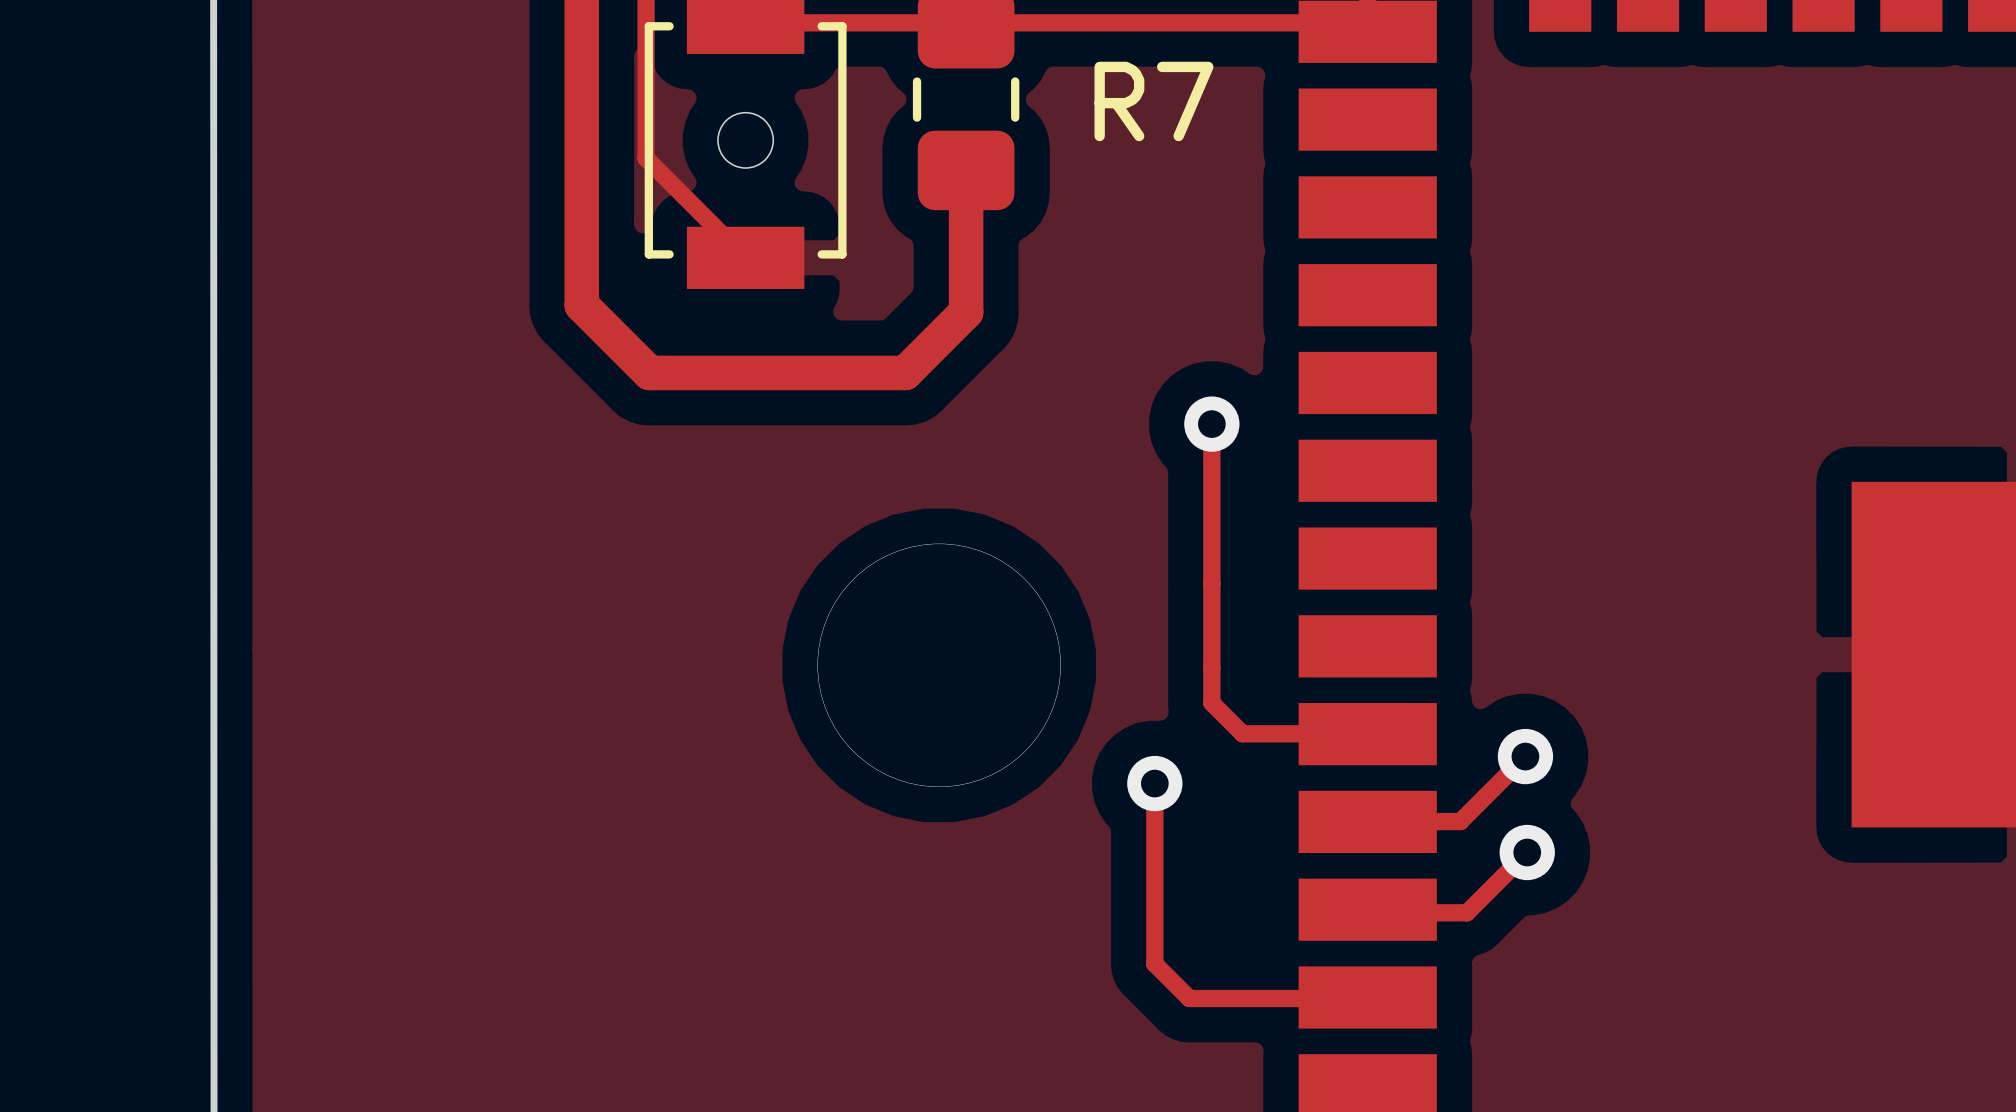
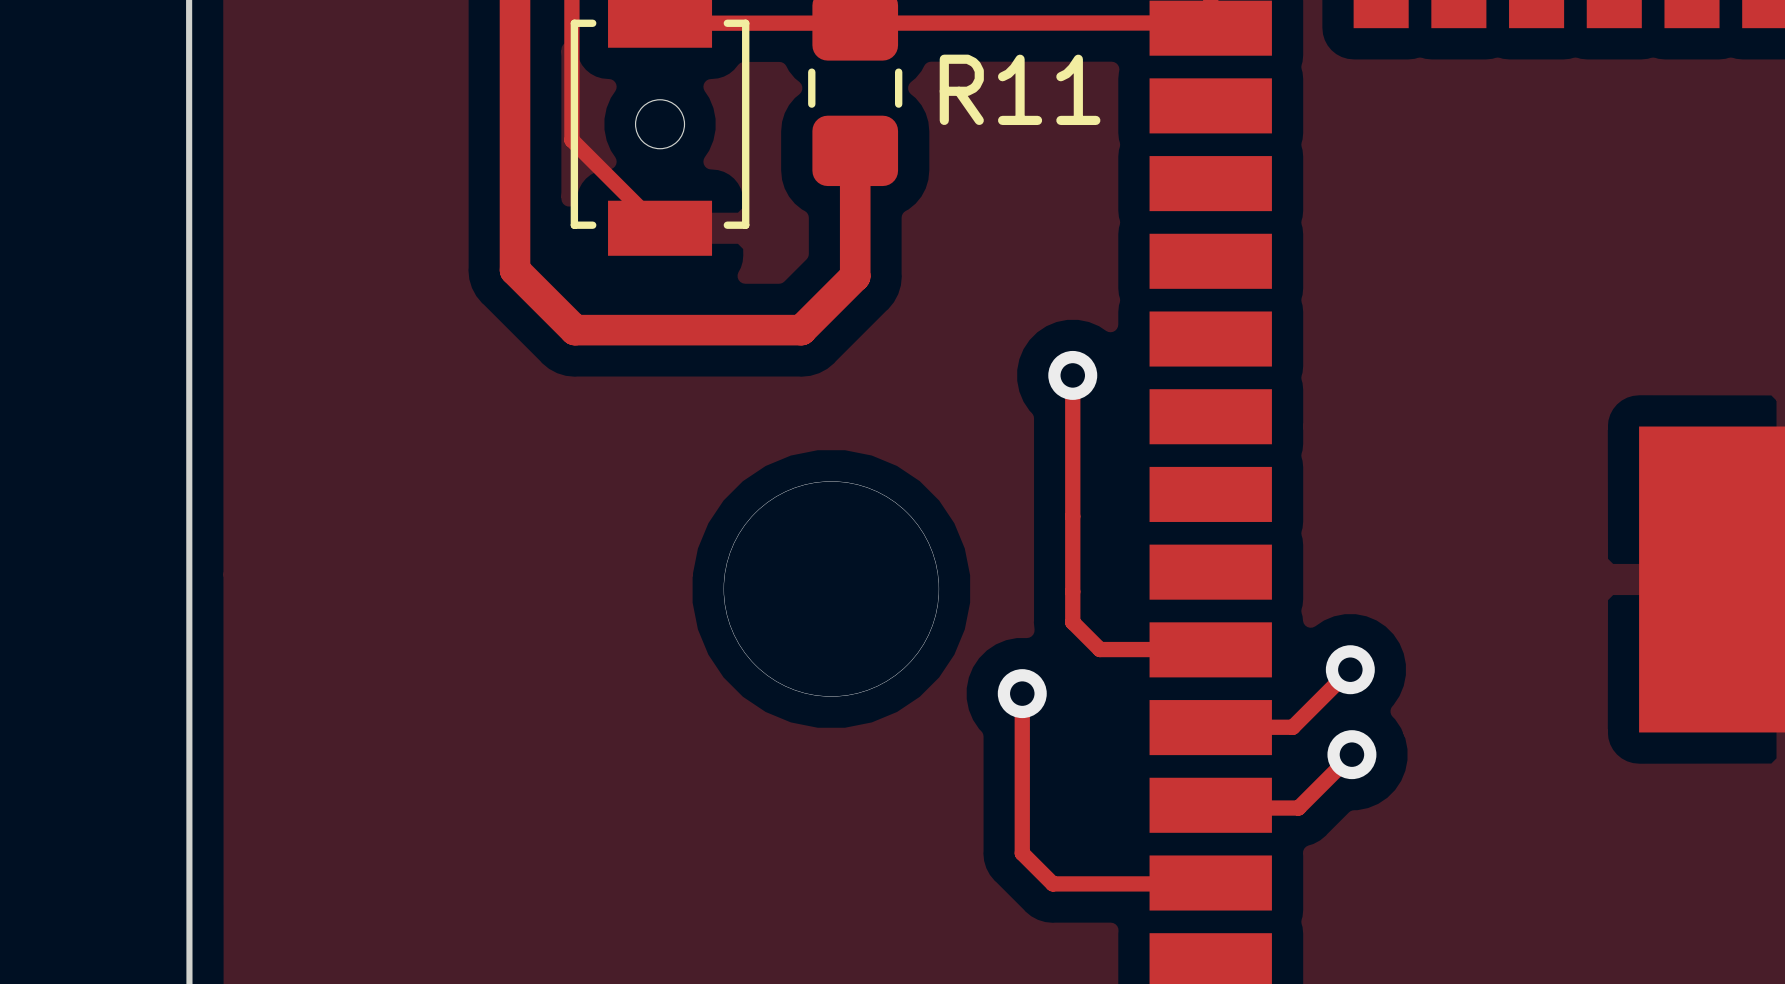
track: (745, 22) (1358, 22) (1367, 31) -> none
track: none -> (1218, 22) (667, 23) (660, 30)
R7 name: R7 (1153, 101) -> R11 (1020, 89)

